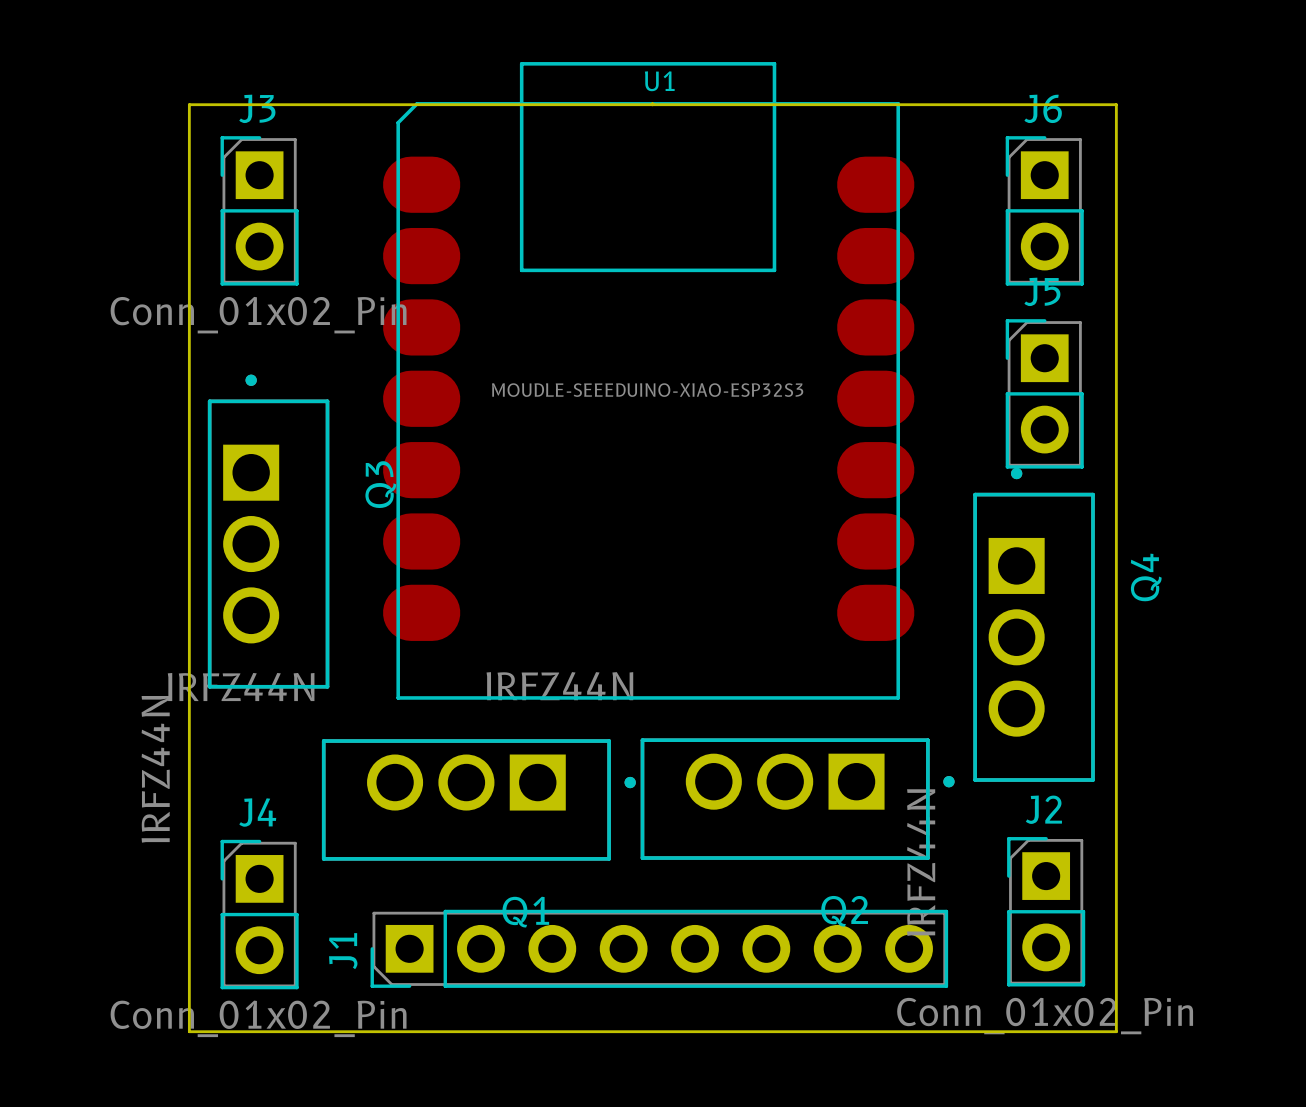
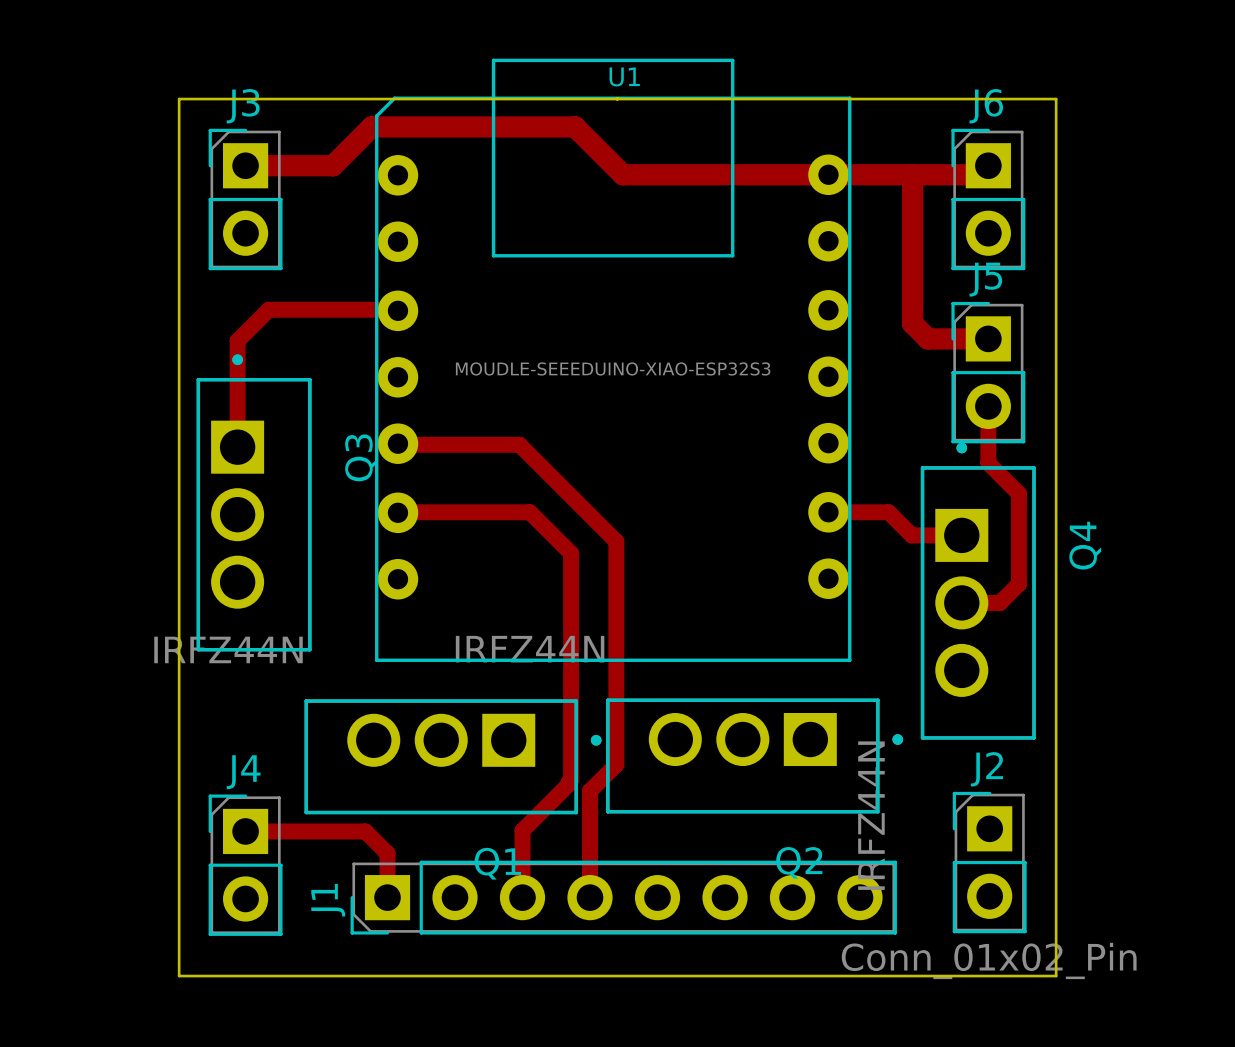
U1 footprint: [383, 62, 915, 700] -> [375, 58, 852, 662]
track: none -> (245, 165) (333, 165) (371, 126) (575, 126) (622, 174) (979, 174) (988, 165)
track: none -> (912, 174) (912, 323) (927, 338) (988, 338)
J3 value: Conn_01x02_Pin (258, 315) -> none
track: none -> (398, 309) (268, 309) (237, 340) (237, 447)
track: none -> (988, 406) (988, 463) (1018, 493) (1018, 584) (1000, 602) (961, 602)
track: none -> (398, 444) (519, 444) (616, 541) (616, 764) (590, 791) (590, 897)
track: none -> (398, 512) (529, 512) (571, 553) (571, 779) (522, 830) (522, 897)
track: none -> (828, 512) (888, 512) (911, 535) (961, 535)
Q3 value: IRFZ44N (155, 769) -> none
track: none -> (245, 831) (365, 831) (387, 853) (387, 897)
J4 value: Conn_01x02_Pin (258, 1018) -> none

